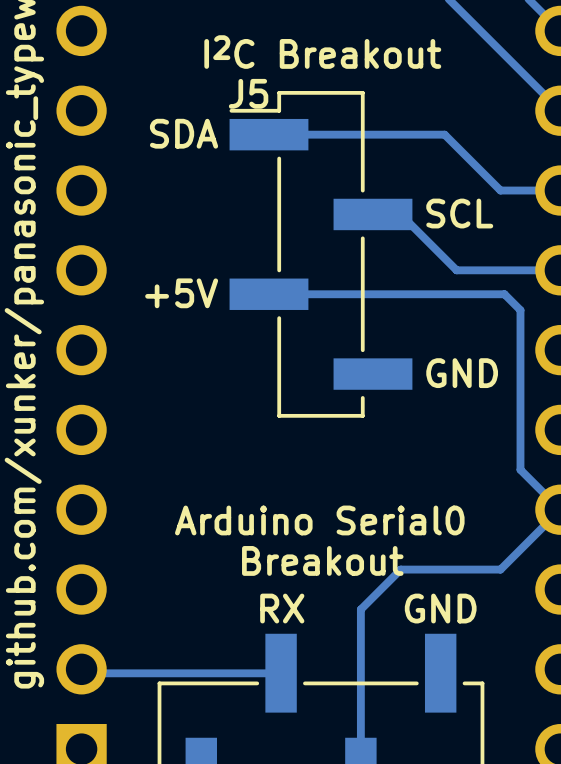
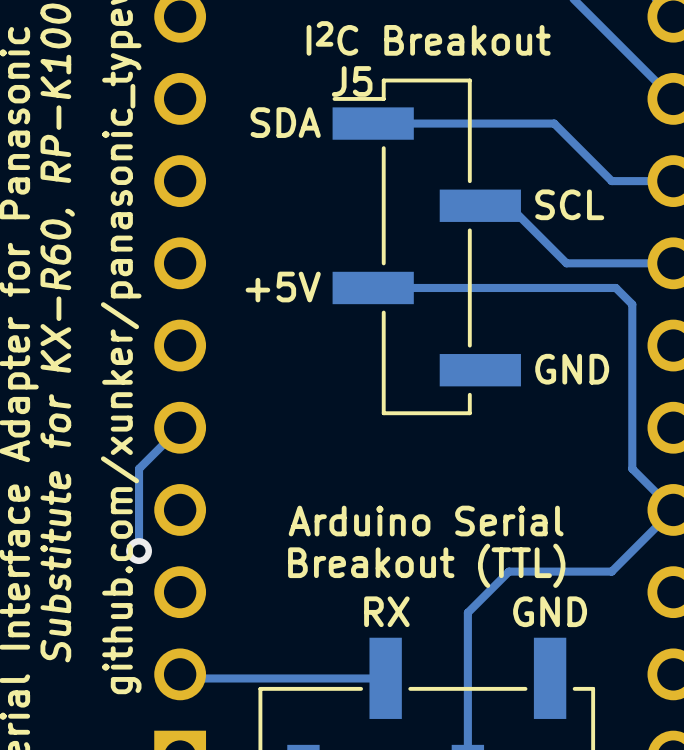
track: none -> (180, 427) (139, 468) (139, 551)
text: Arduino Serial0 (319, 520) -> Arduino Serial (426, 521)
via: none -> (139, 551)
text: Breakout (322, 560) -> Breakout (TTL) (426, 565)

